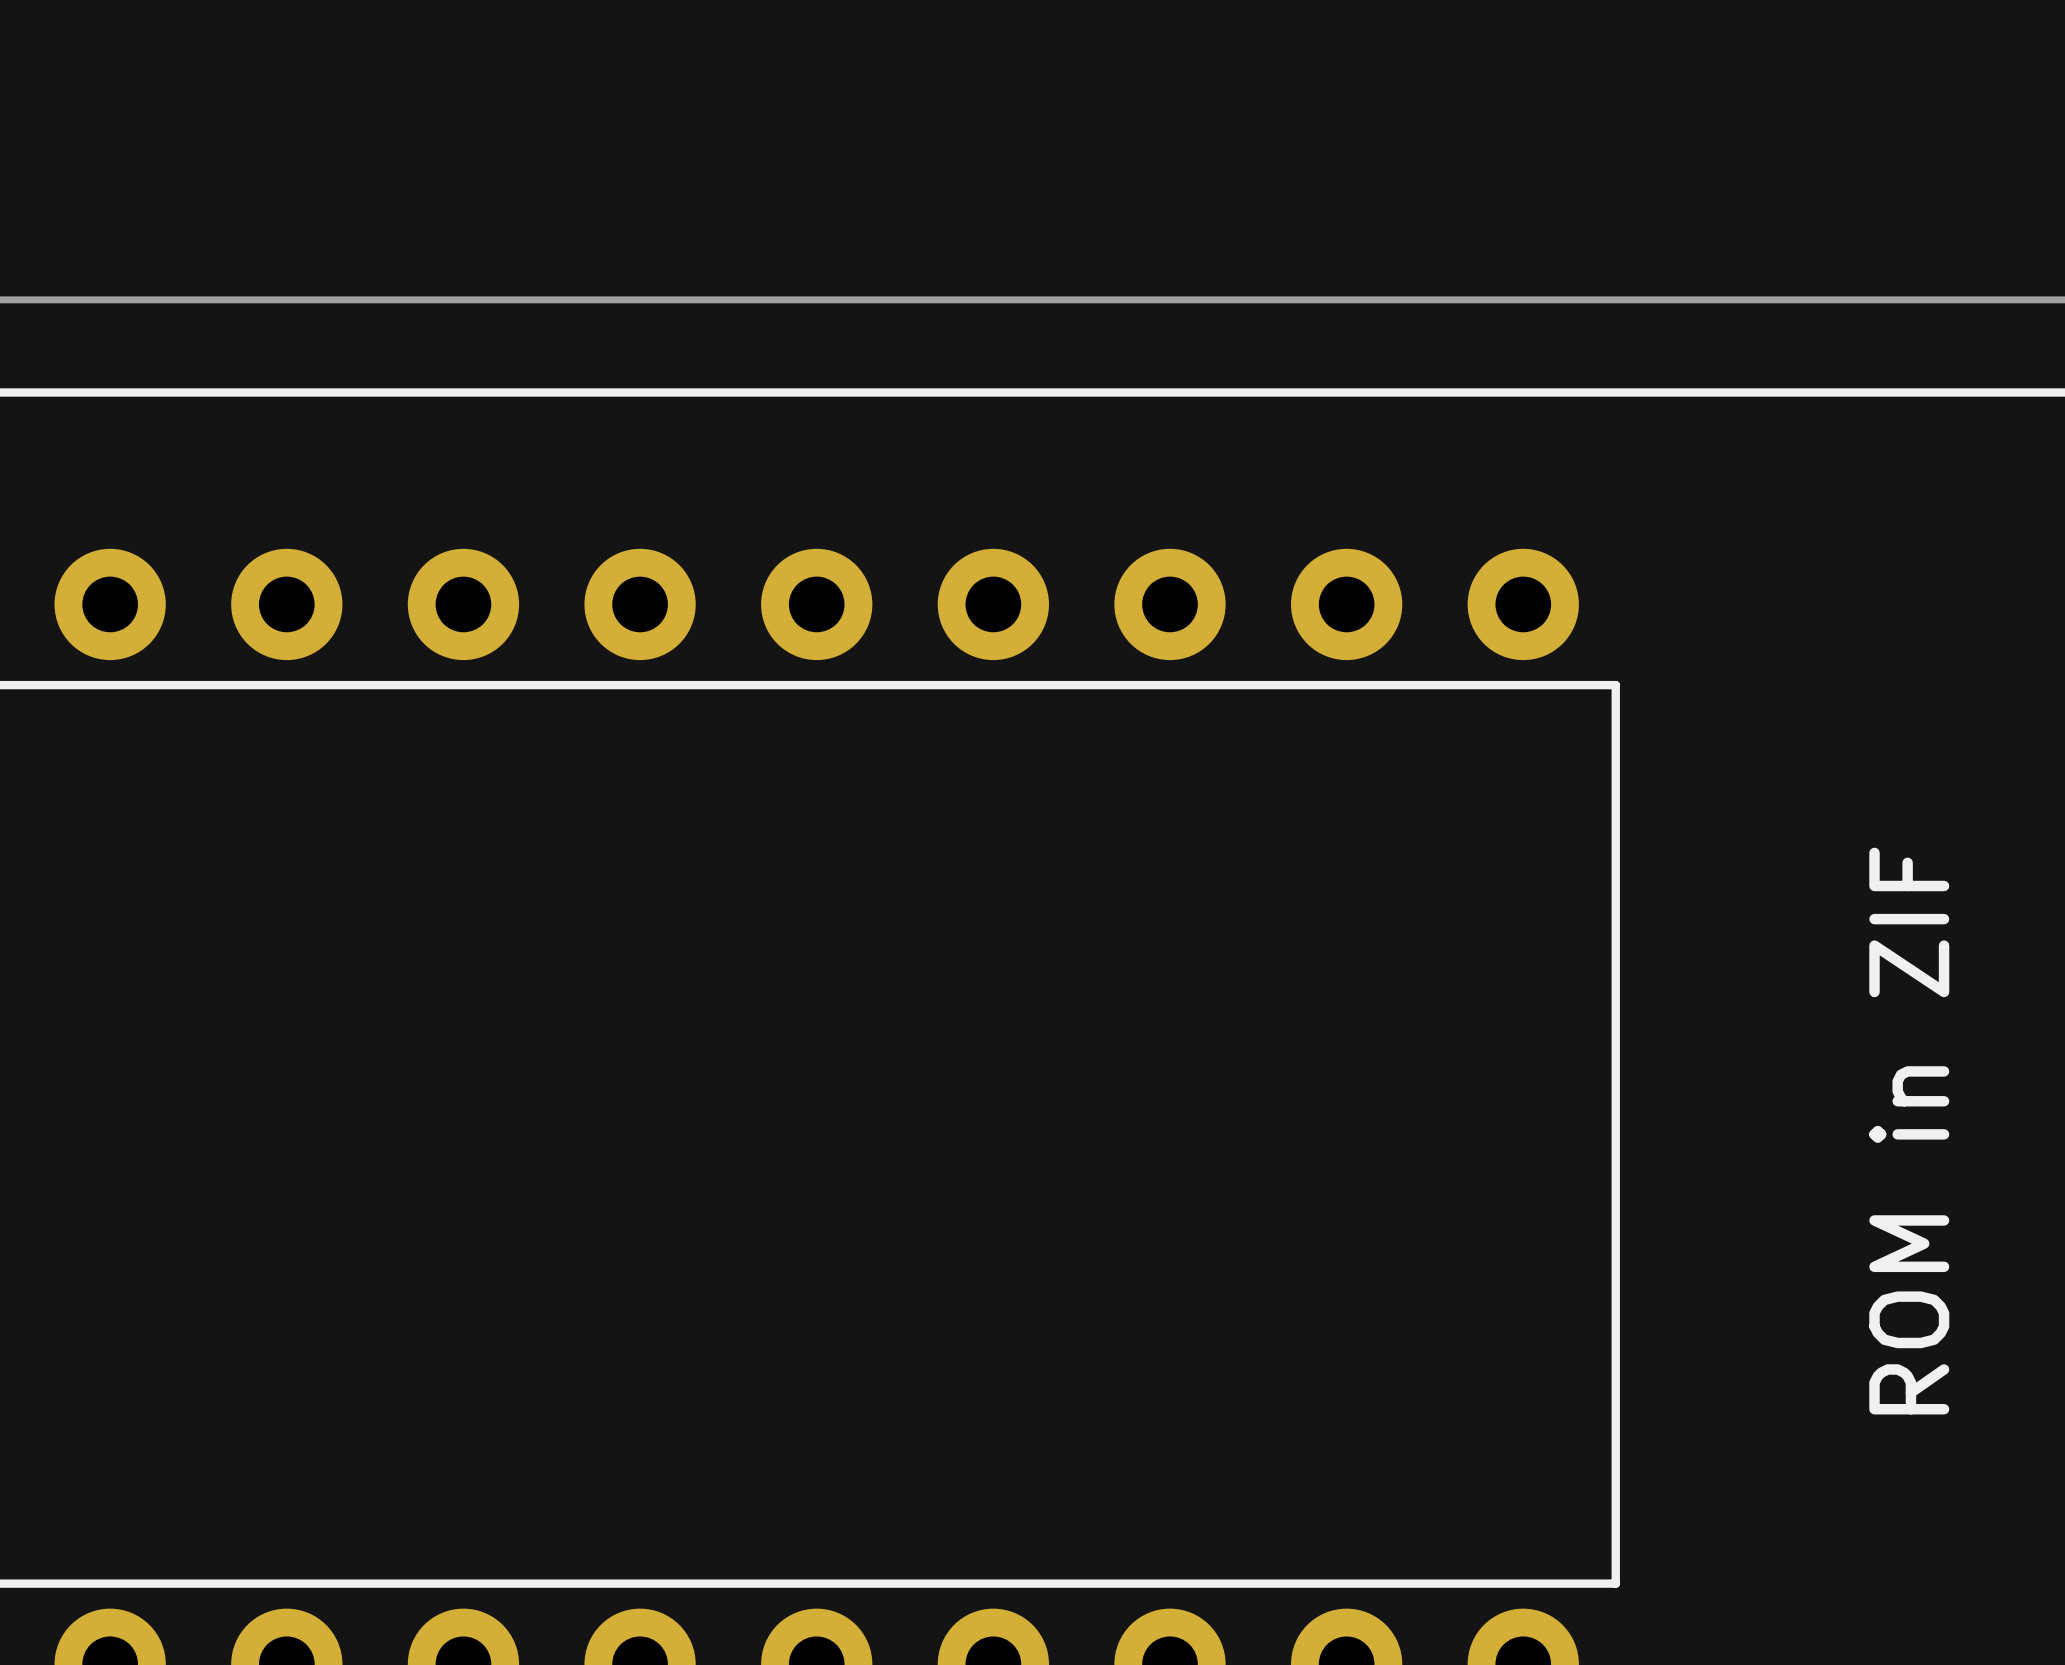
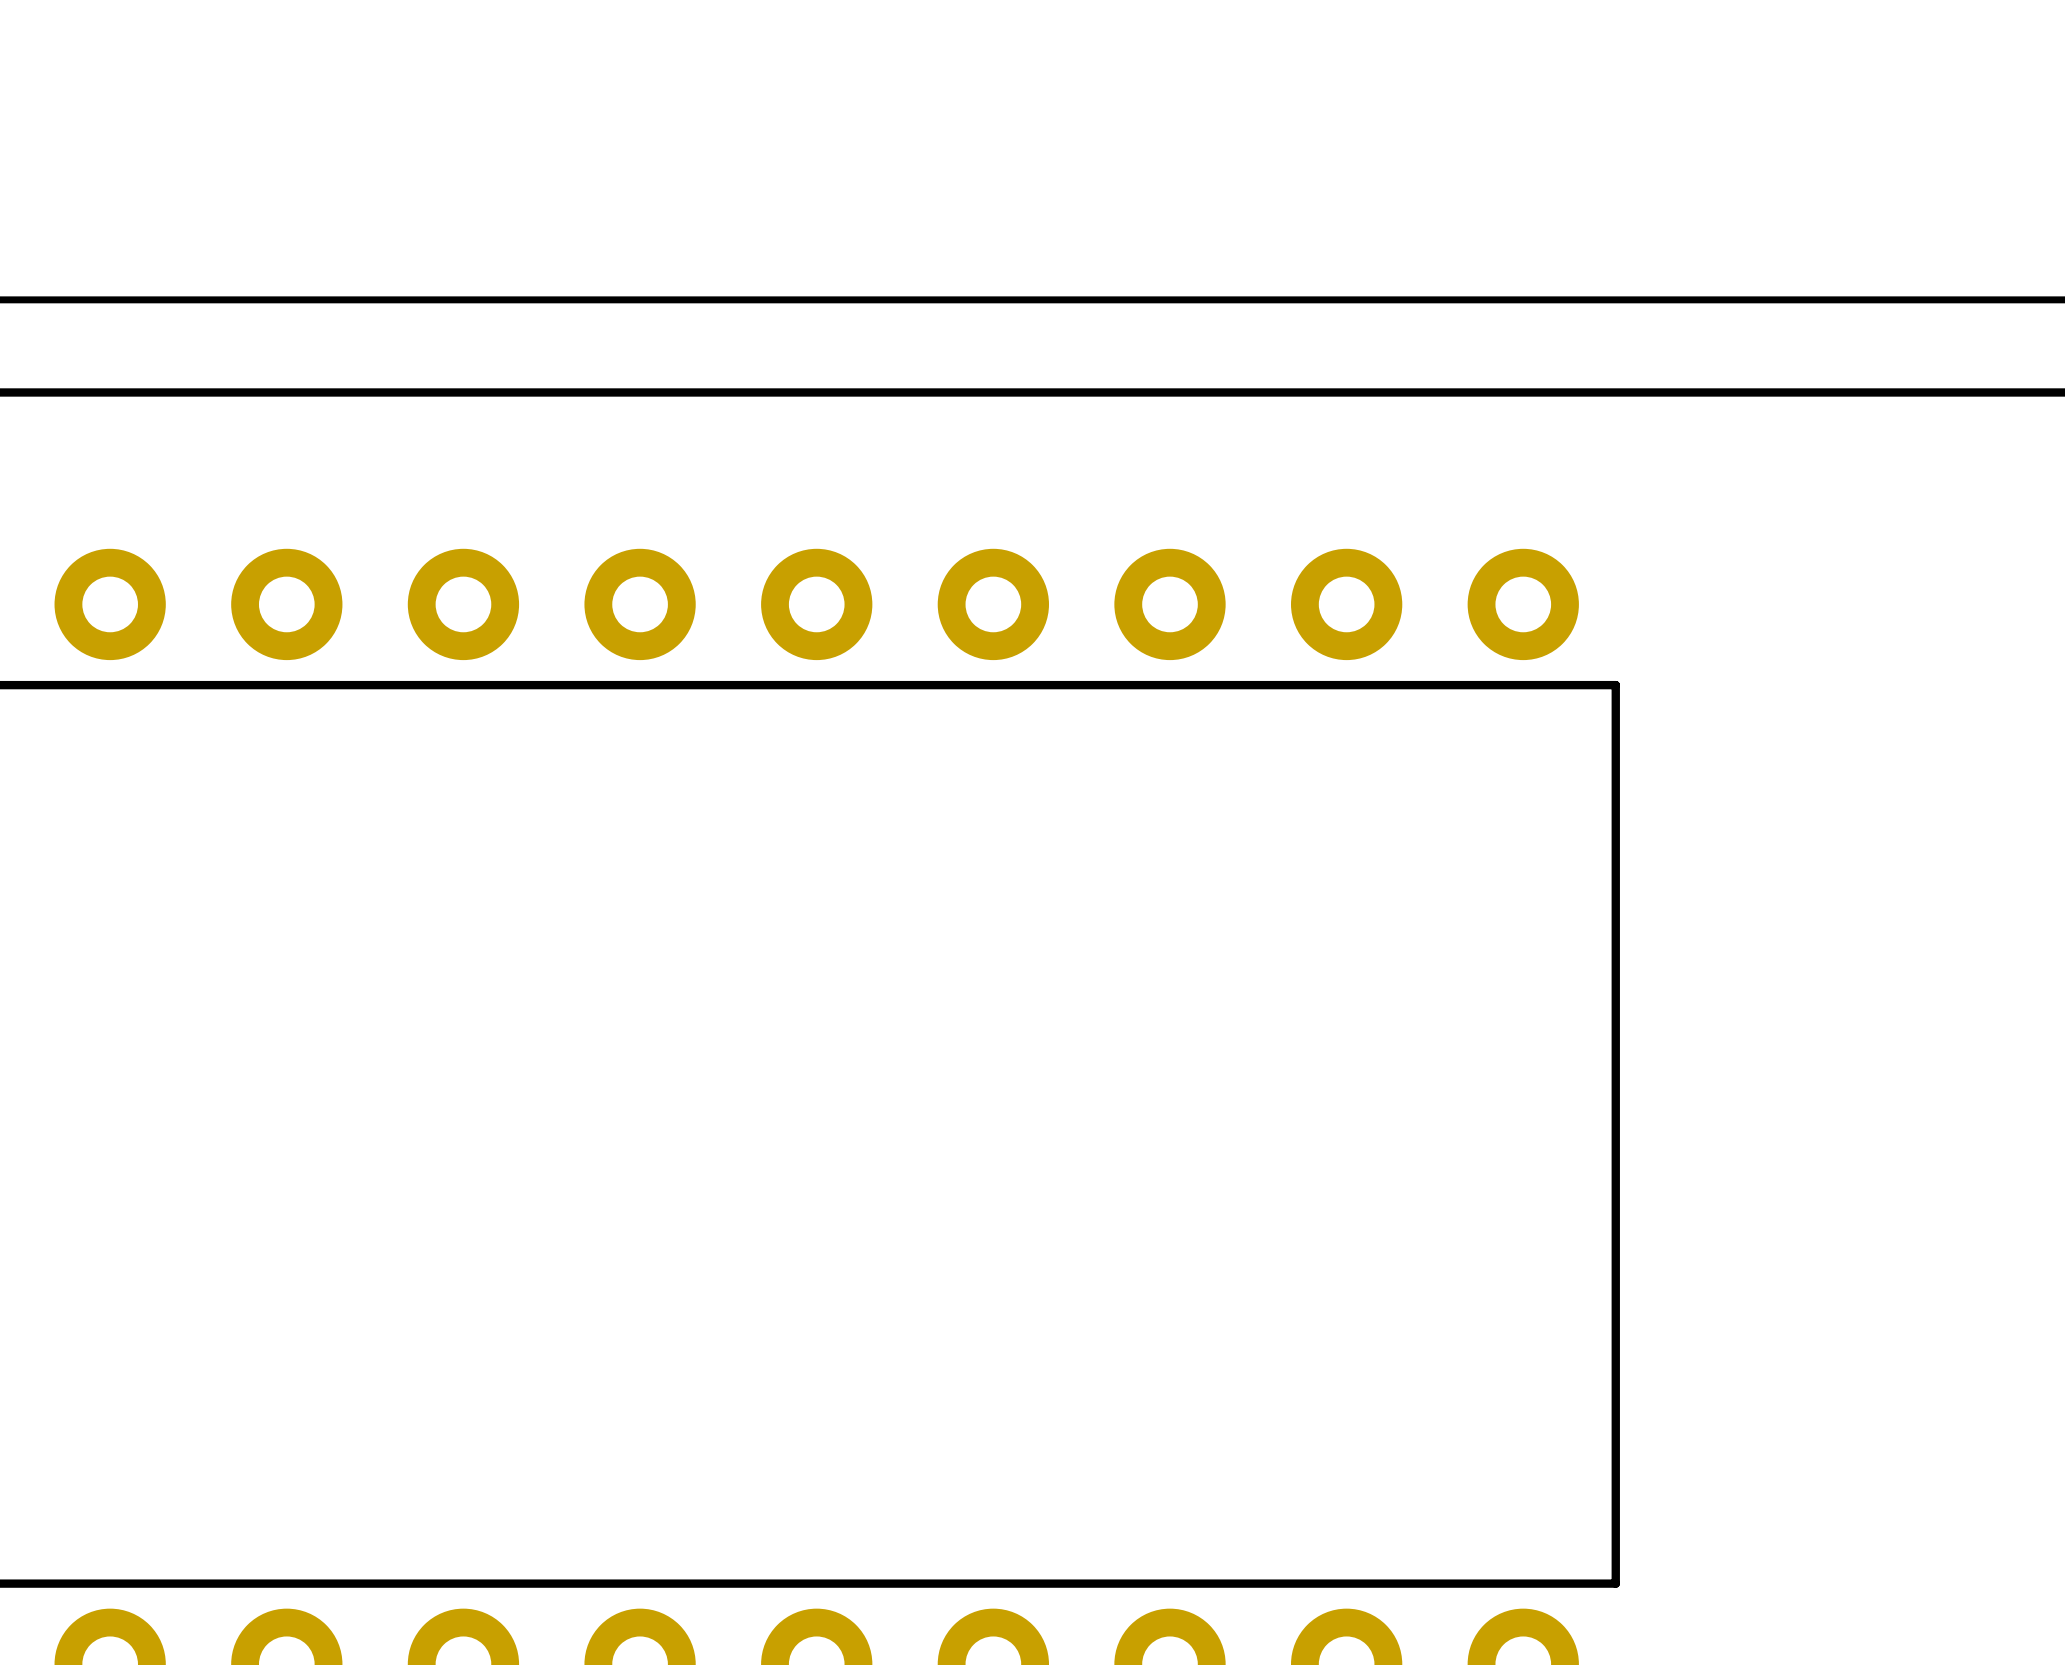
part text: ROM in ZIF (1909, 1131) -> none

